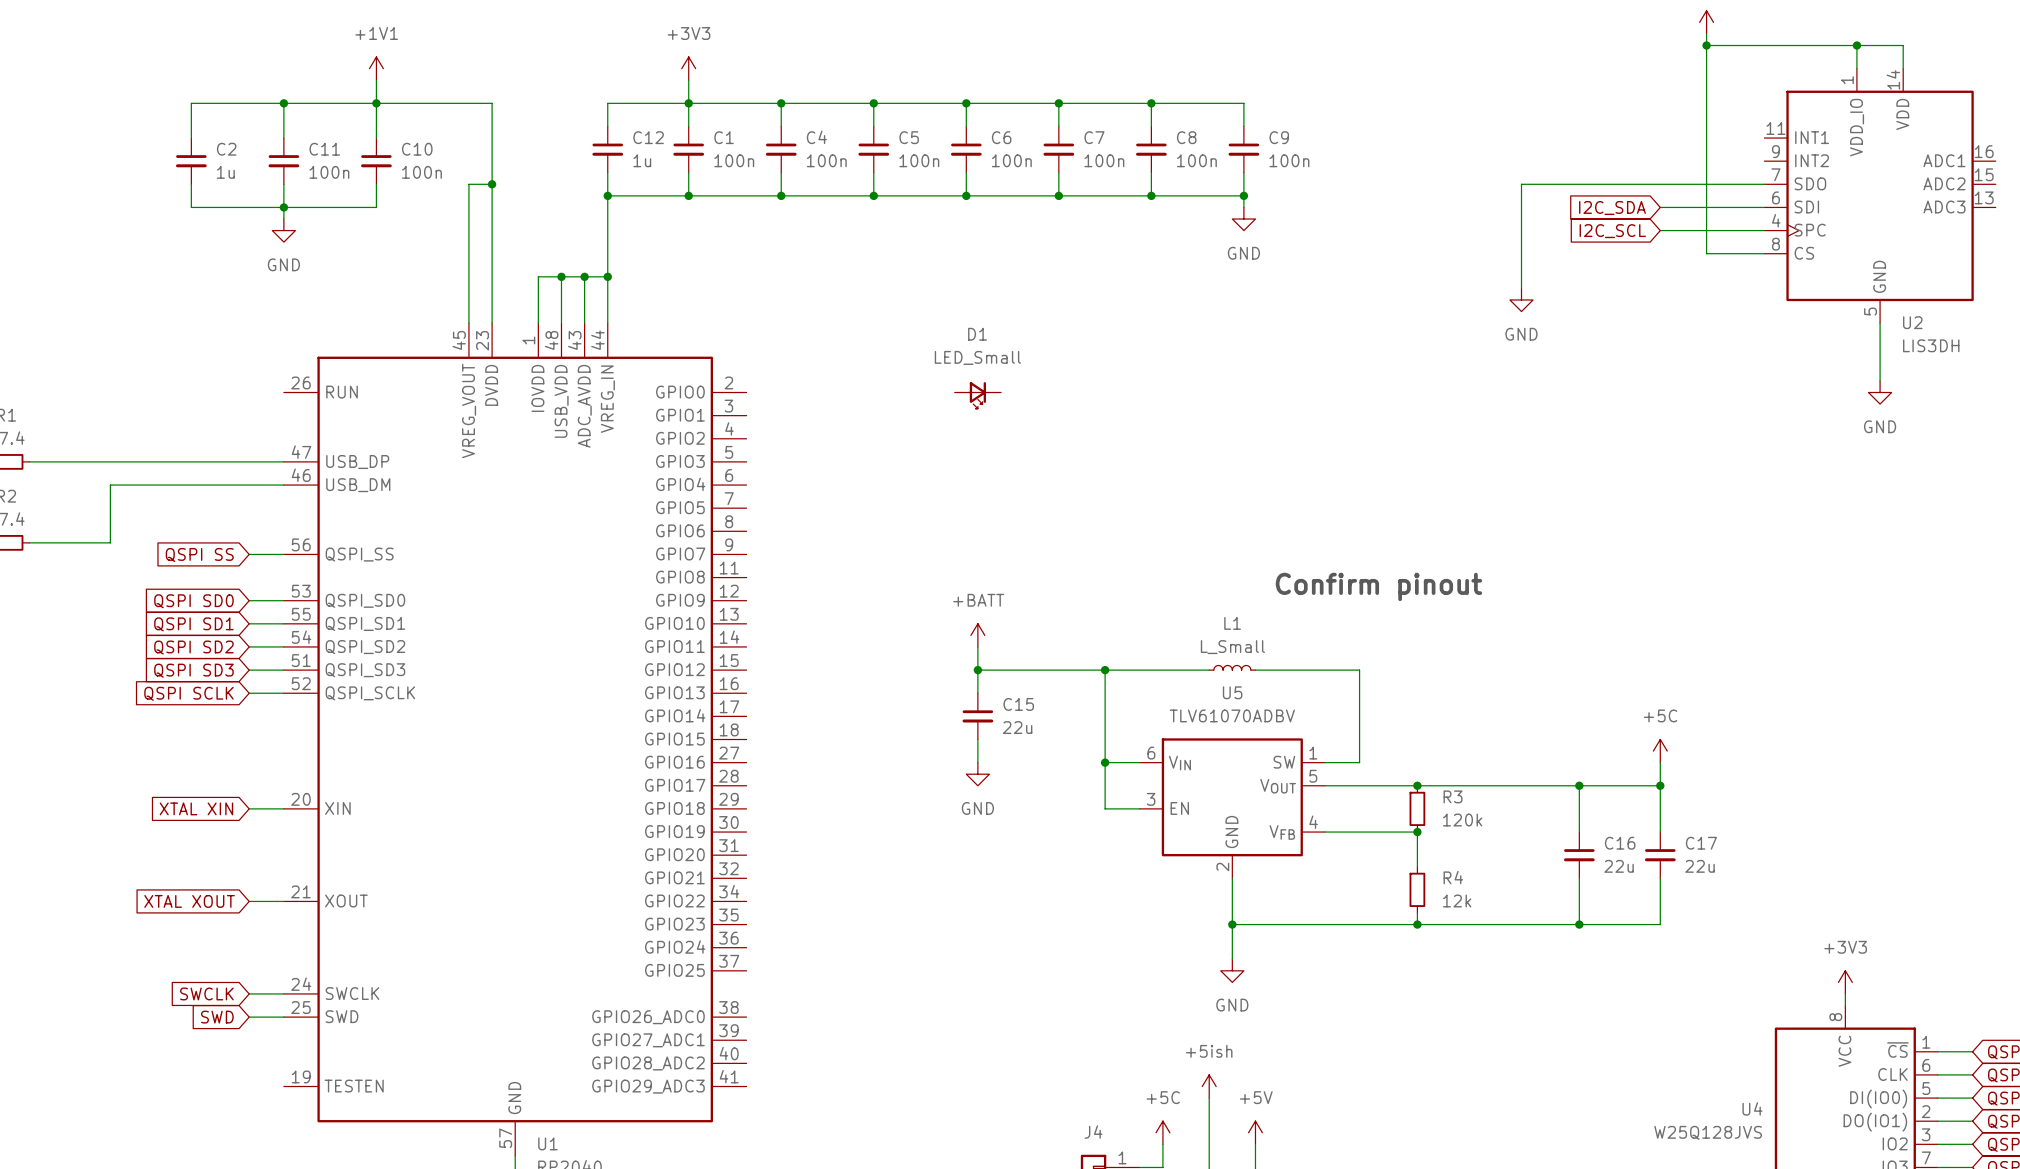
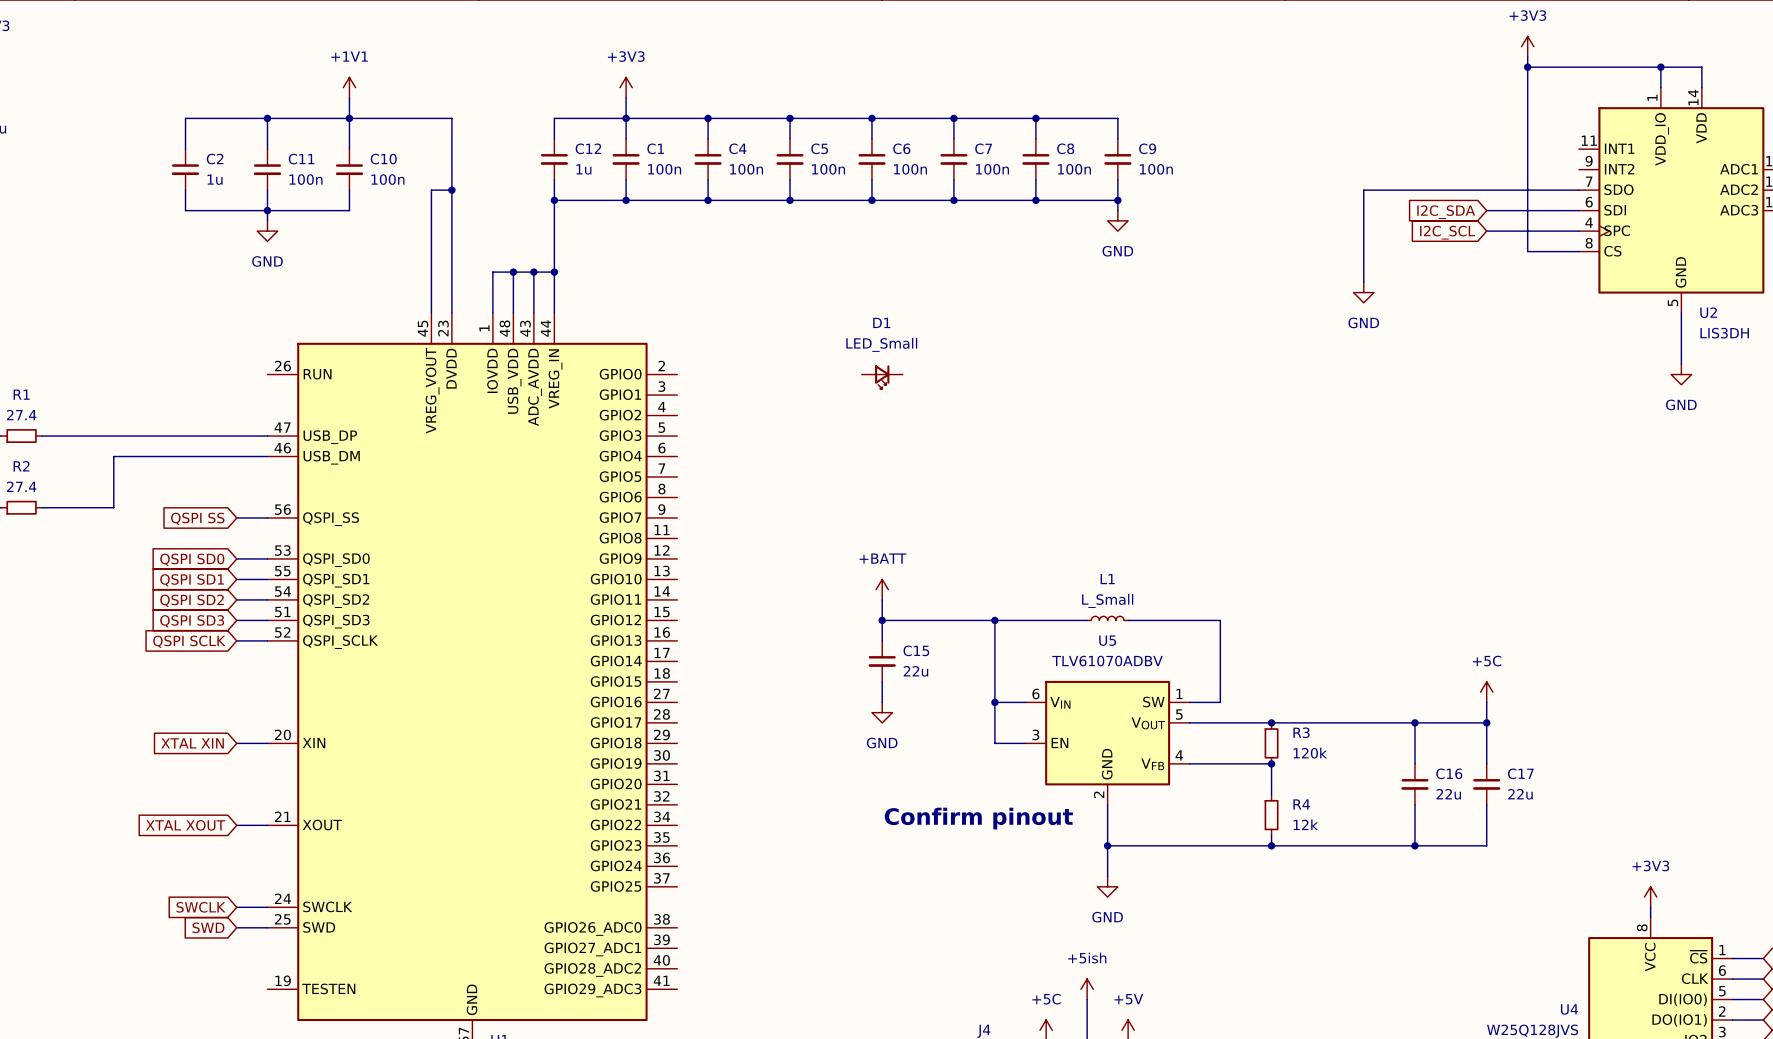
text: Confirm pinout (1378, 586) -> none
text: none -> Confirm pinout (978, 818)

